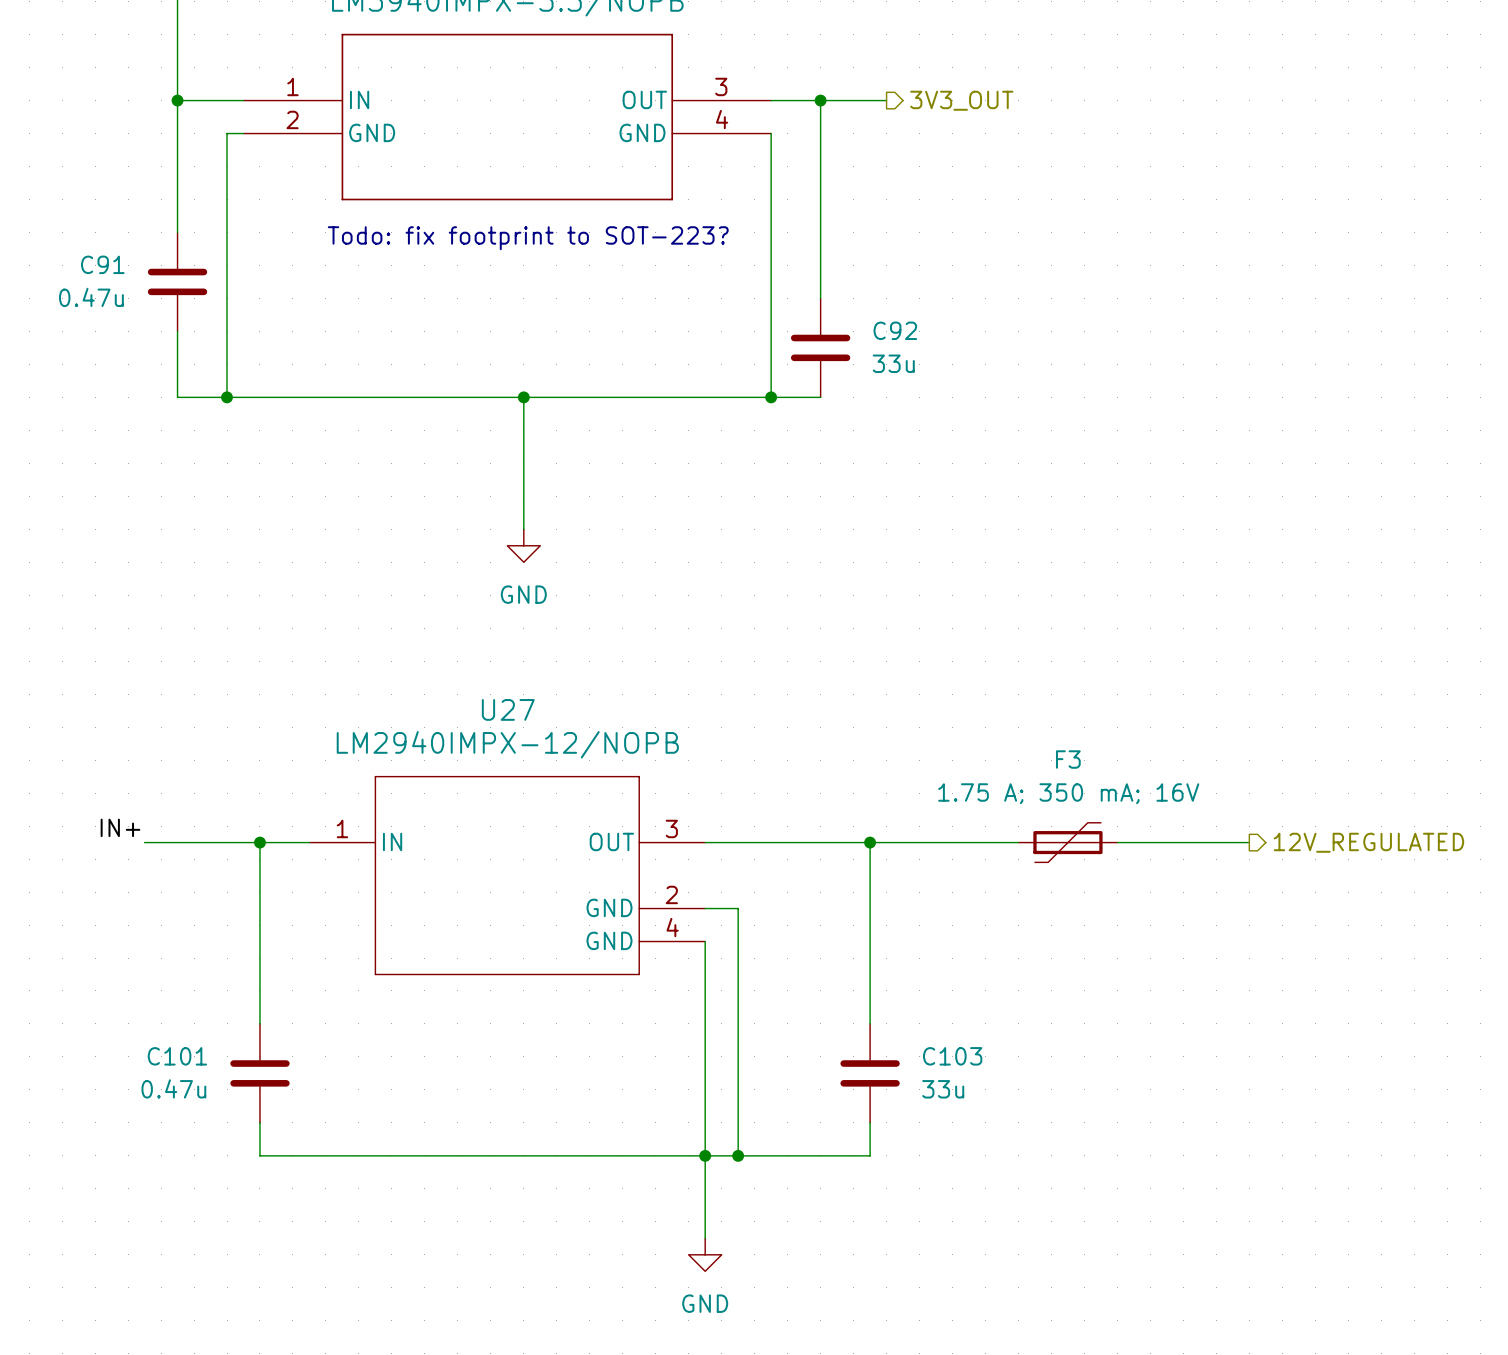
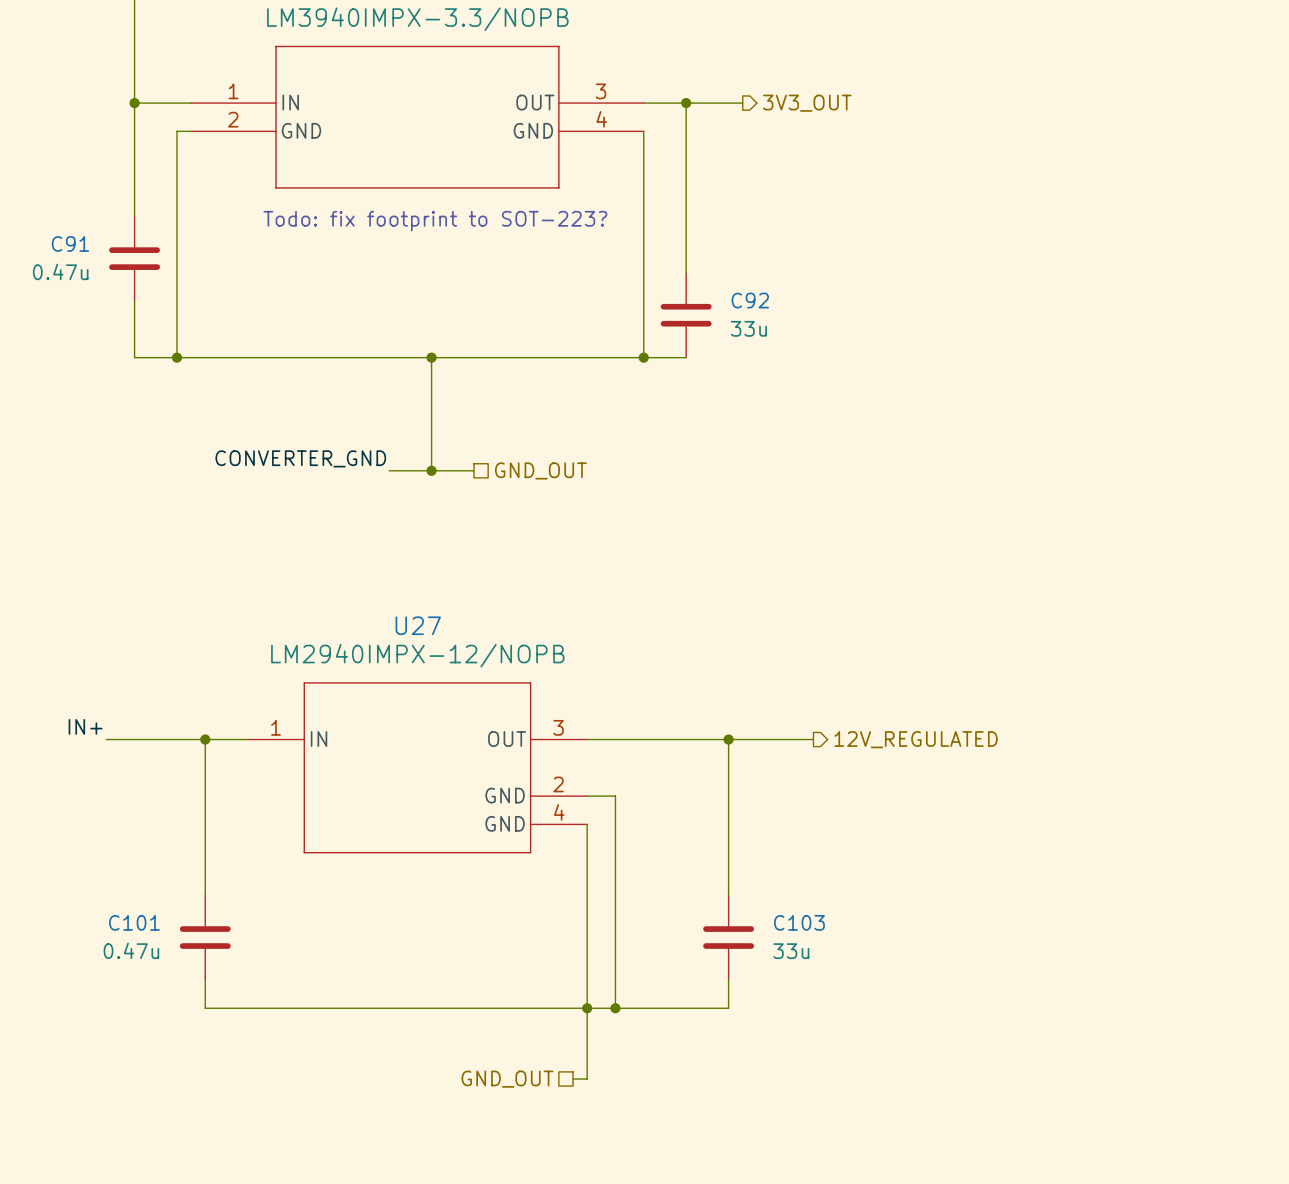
label: none -> CONVERTER_GND (300, 458)
wire: none -> (389, 470) (474, 470)
junction: none -> (431, 470)
hierarchical label: none -> GND_OUT (540, 470)
power symbol: GND (523, 545) -> none
wire: (969, 842) (1018, 842) -> none
F3: 1.75 A; 350 mA; 16V (1067, 842) -> none
wire: (1117, 842) (1249, 842) -> none
hierarchical label position: 12V_REGULATED (1368, 842) -> 12V_REGULATED (916, 739)
hierarchical label: none -> GND_OUT (507, 1079)
wire: none -> (573, 1078) (587, 1078)
power symbol: GND (705, 1254) -> none

